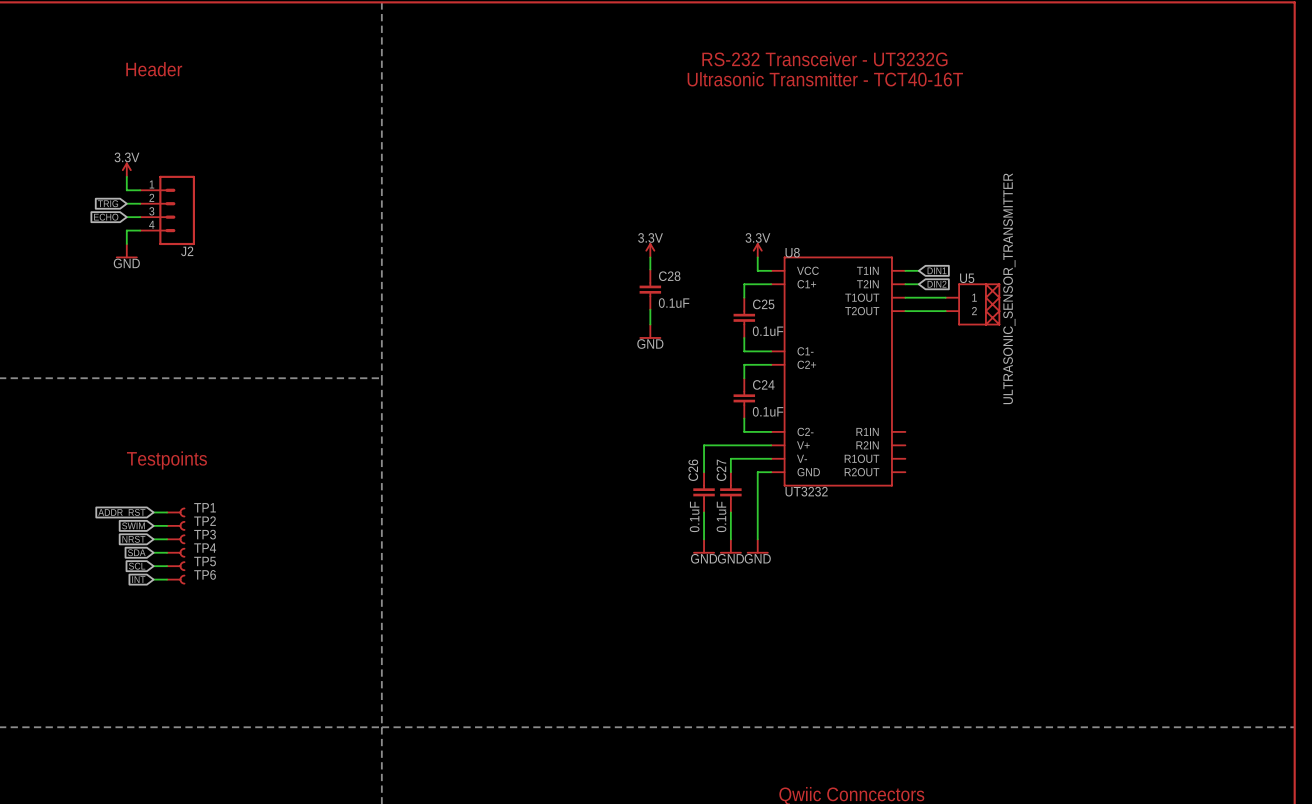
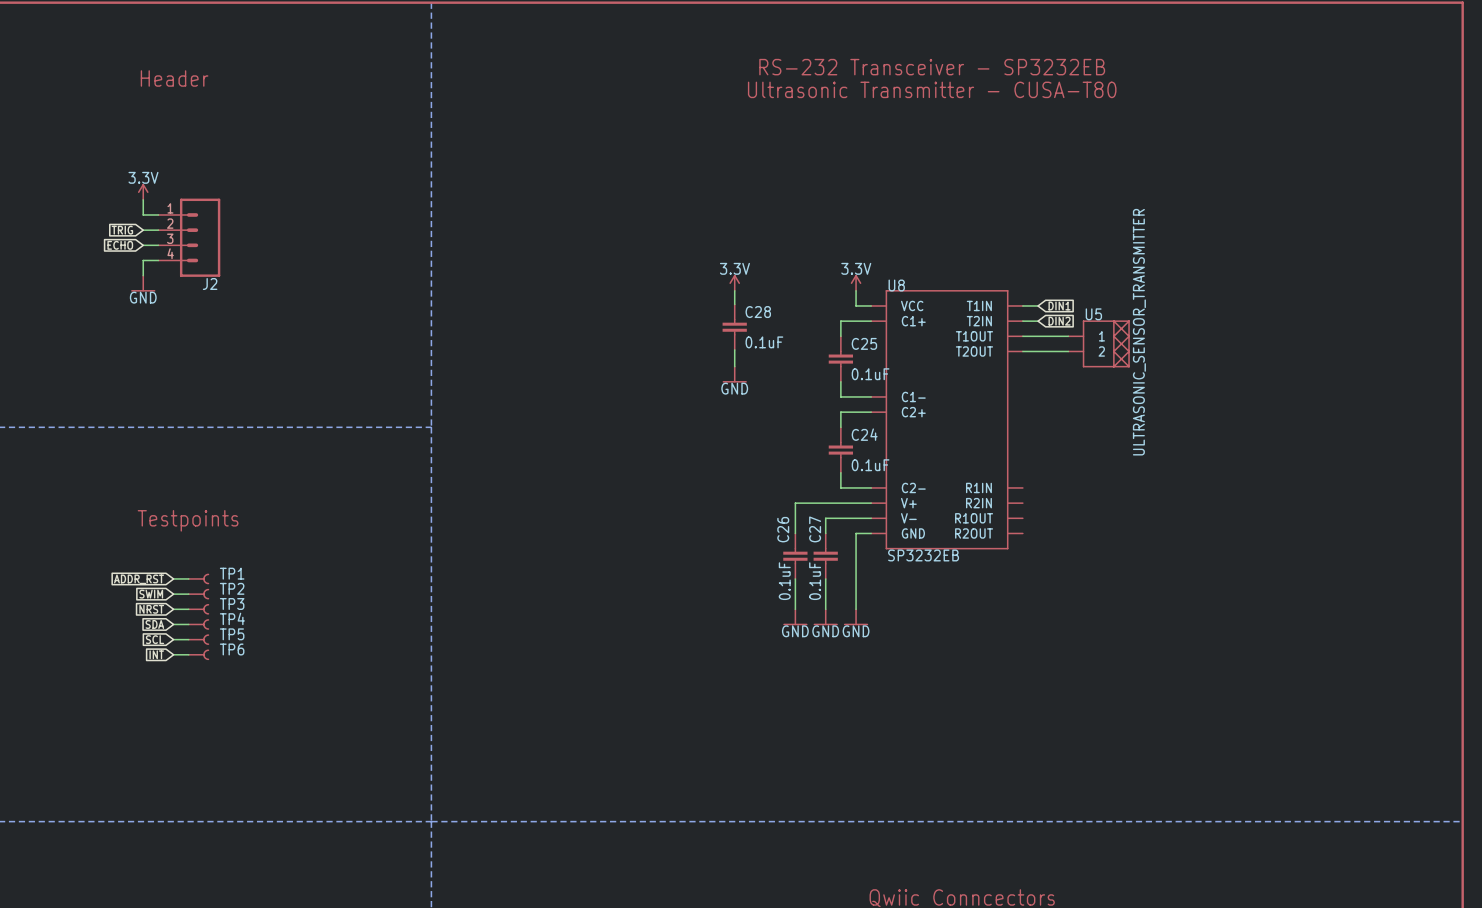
text: RS-232 Transceiver - UT3232G (824, 59) -> RS-232 Transceiver - SP3232EB (932, 67)
text: Ultrasonic Transmitter - TCT40-16T (825, 79) -> Ultrasonic Transmitter - CUSA-T80 (932, 89)
U8 value: UT3232 (806, 491) -> SP3232EB (923, 555)

